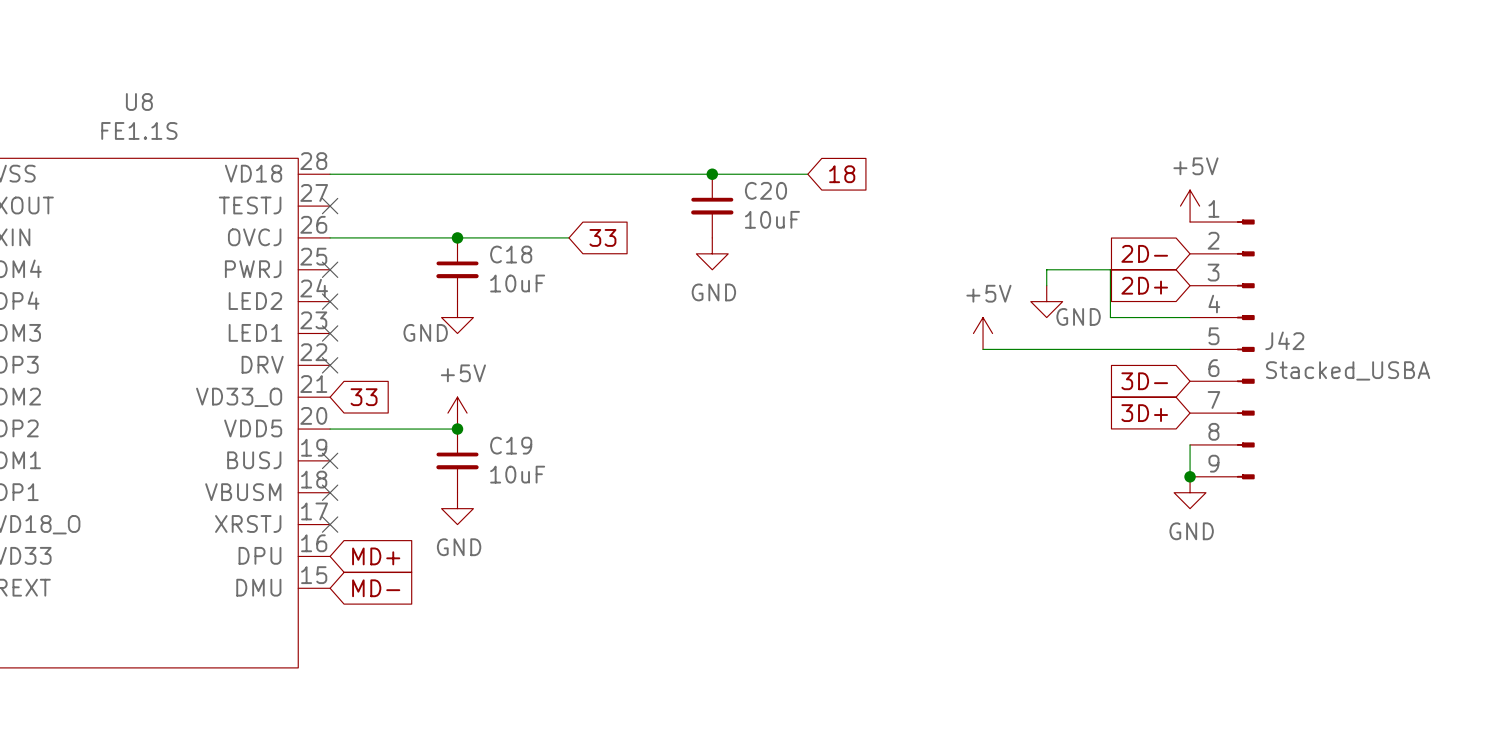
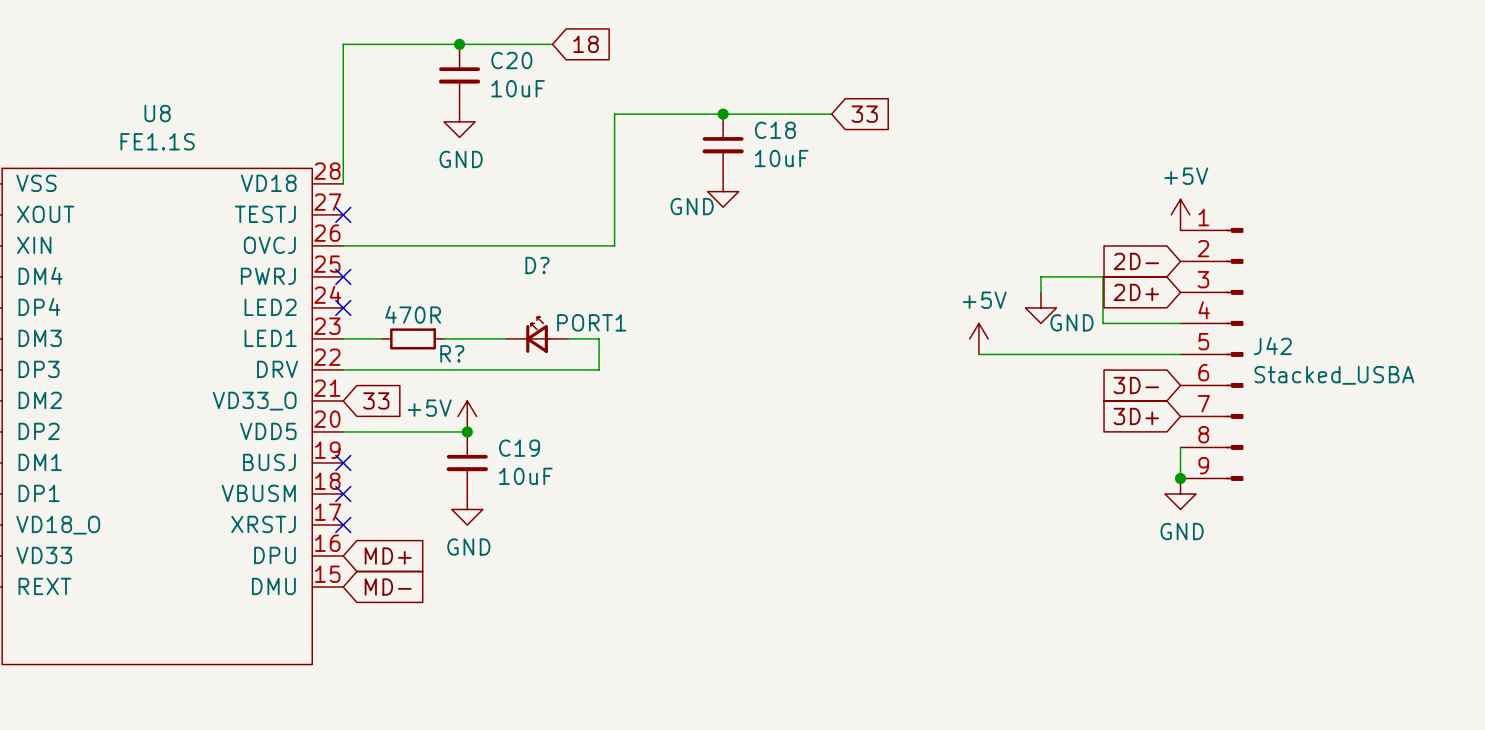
junction: none -> (459, 44)
wire: none -> (831, 114) (614, 114) (614, 245) (575, 245)
power symbol: none -> GND (459, 121)
wire: (330, 174) (807, 174) -> (343, 183) (343, 44) (552, 44)
junction position: (712, 174) -> (723, 114)
global label position: 18 (842, 174) -> 18 (586, 44)
C20 position: (712, 206) -> (459, 75)
junction: (457, 237) -> none
global label position: 33 (602, 237) -> 33 (864, 114)
power symbol position: GND (712, 253) -> GND (723, 191)
C18 position: (457, 269) -> (723, 145)
power symbol text position: GND (713, 292) -> GND (692, 206)
power symbol: GND (457, 317) -> none
D?: none -> PORT1 (537, 335)
wire: none -> (343, 338) (382, 338)
no-connect mark: (330, 333) -> none
R?: none -> 470R (413, 338)
wire: none -> (444, 338) (506, 338)
wire: none -> (568, 338) (599, 338) (599, 369) (343, 369)
no-connect mark: (330, 365) -> none
power symbol text position: +5V (463, 373) -> +5V (429, 408)

